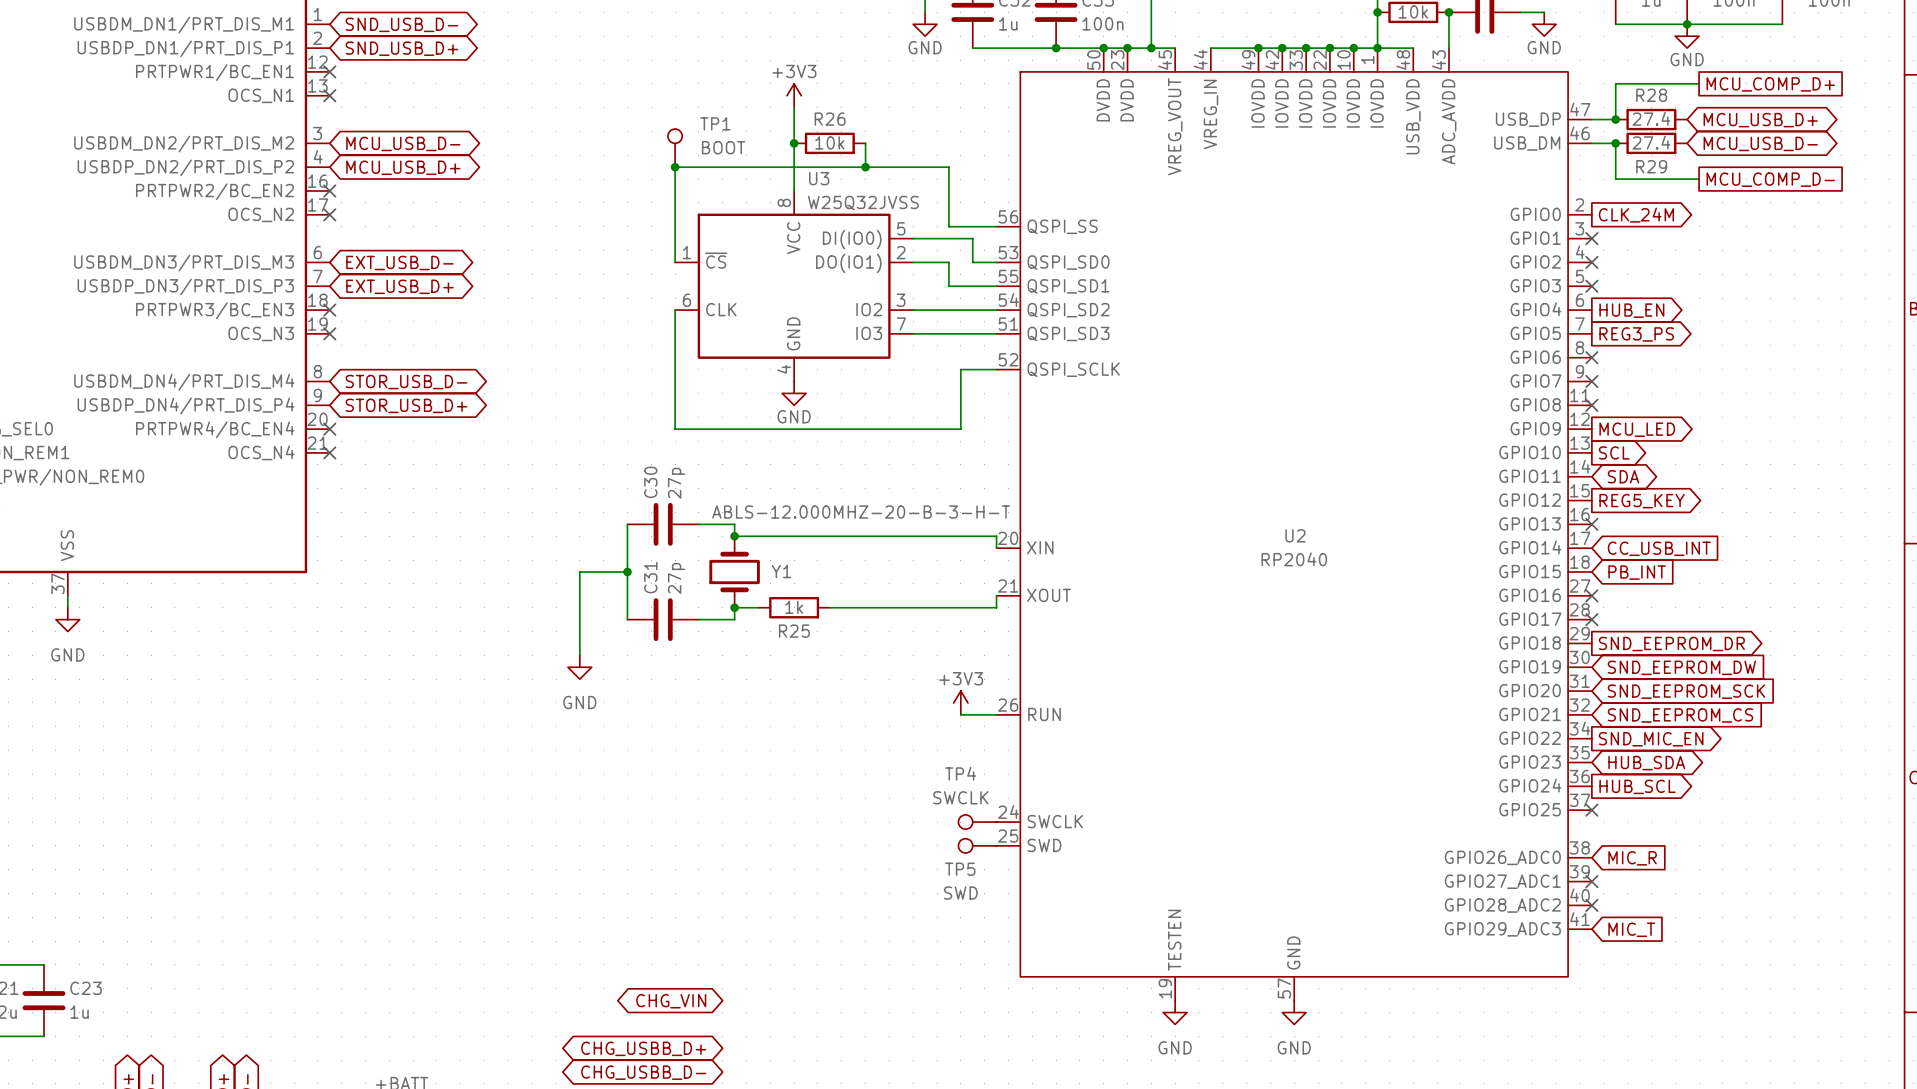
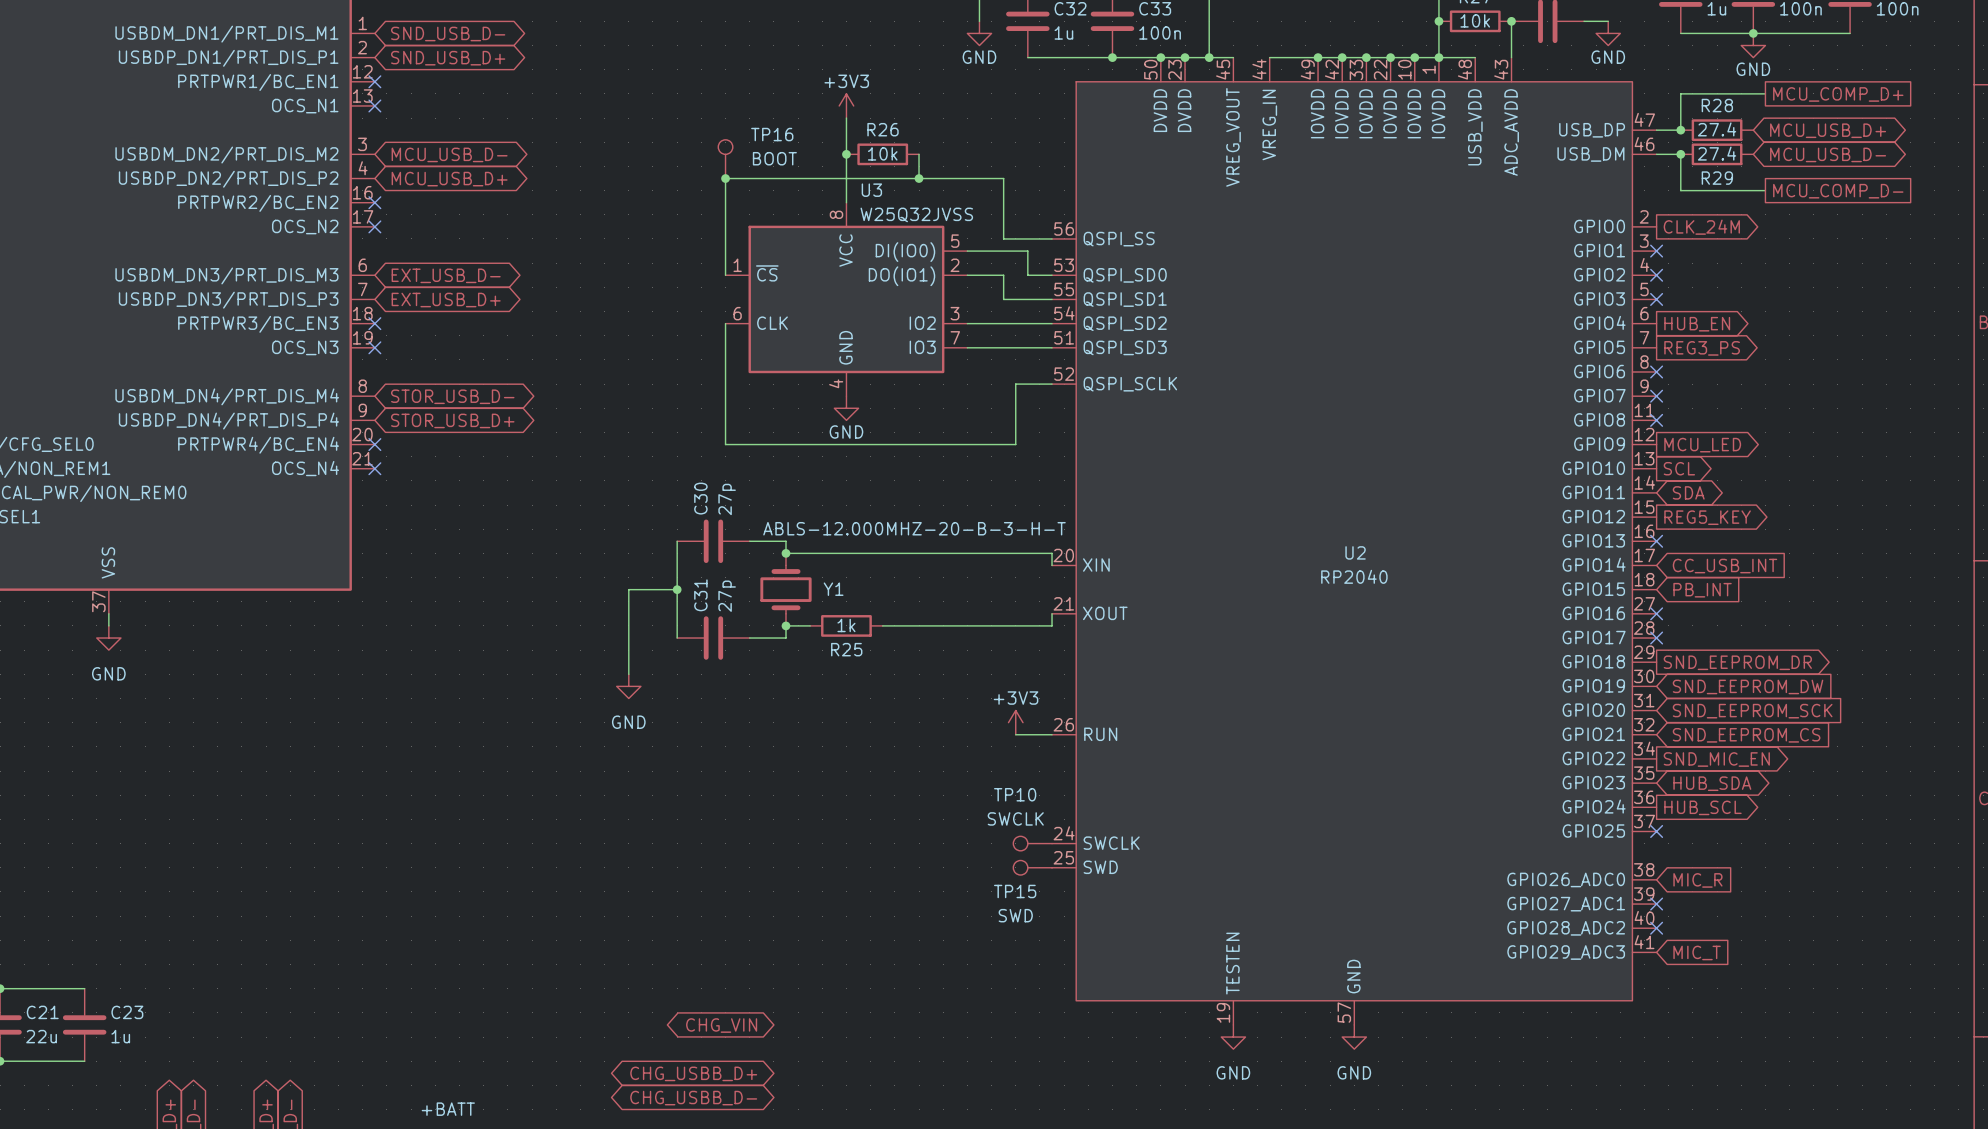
TP1 name: TP1 (715, 123) -> TP16 (772, 134)
TP4 name: TP4 (960, 773) -> TP10 (1015, 794)
TP5 name: TP5 (960, 869) -> TP15 (1015, 891)

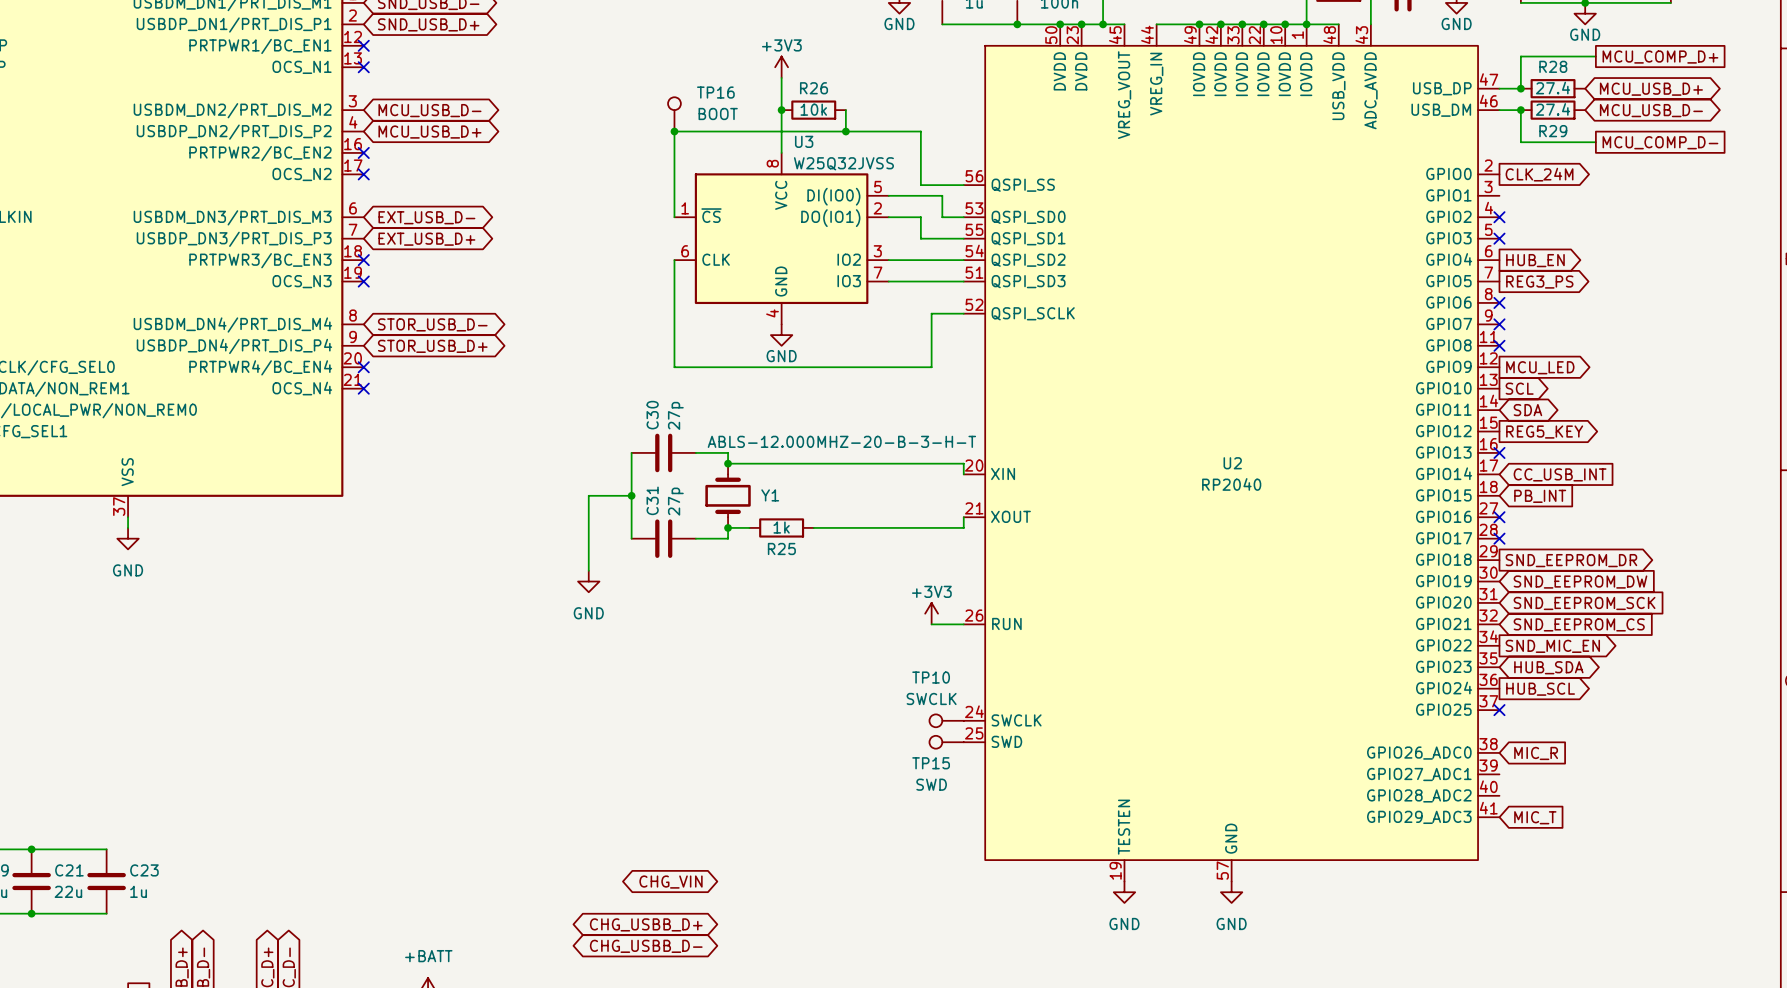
no-connect mark: (1656, 251) -> none
no-connect mark: (1656, 904) -> none
no-connect mark: (1656, 928) -> none

